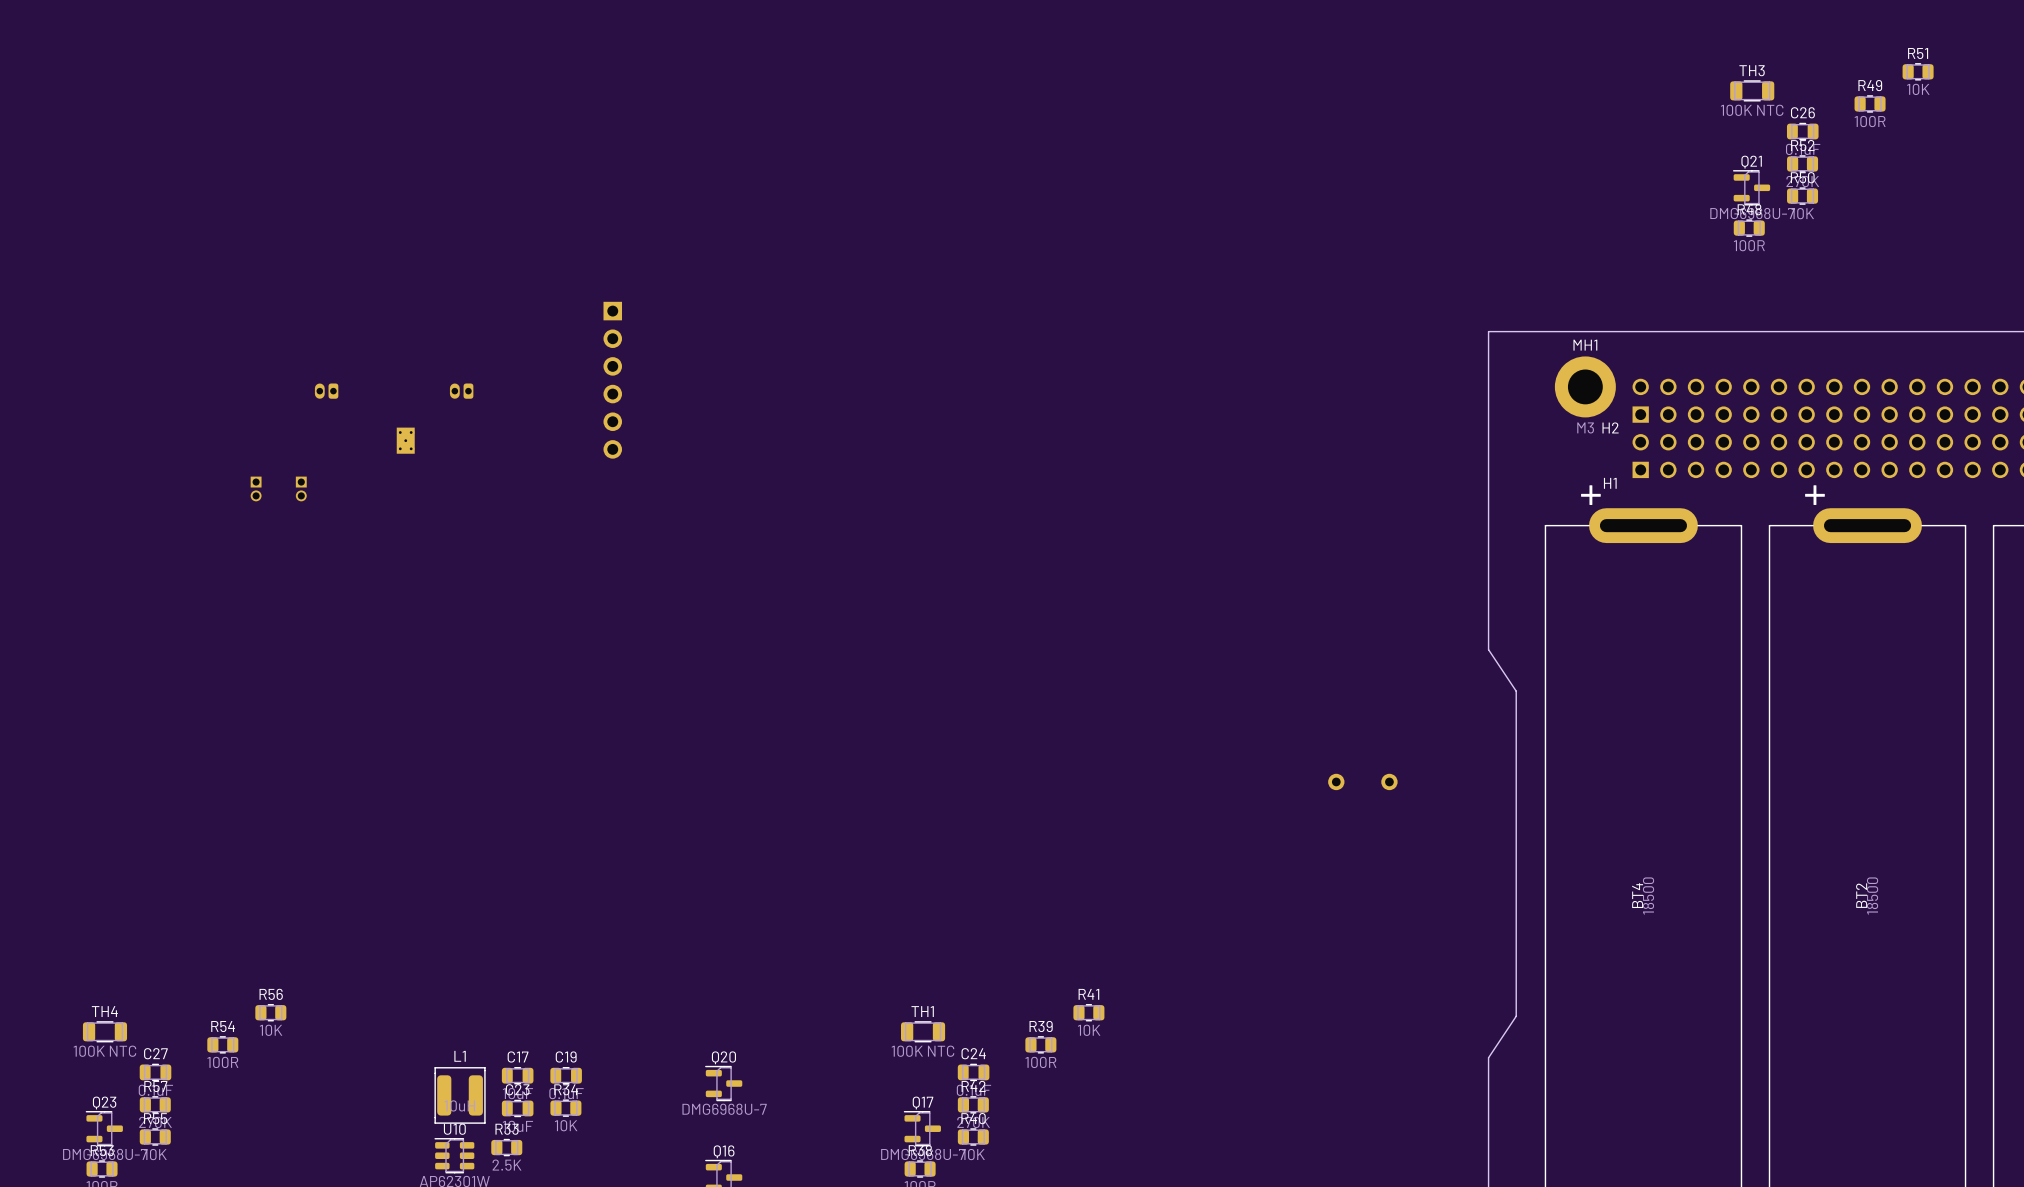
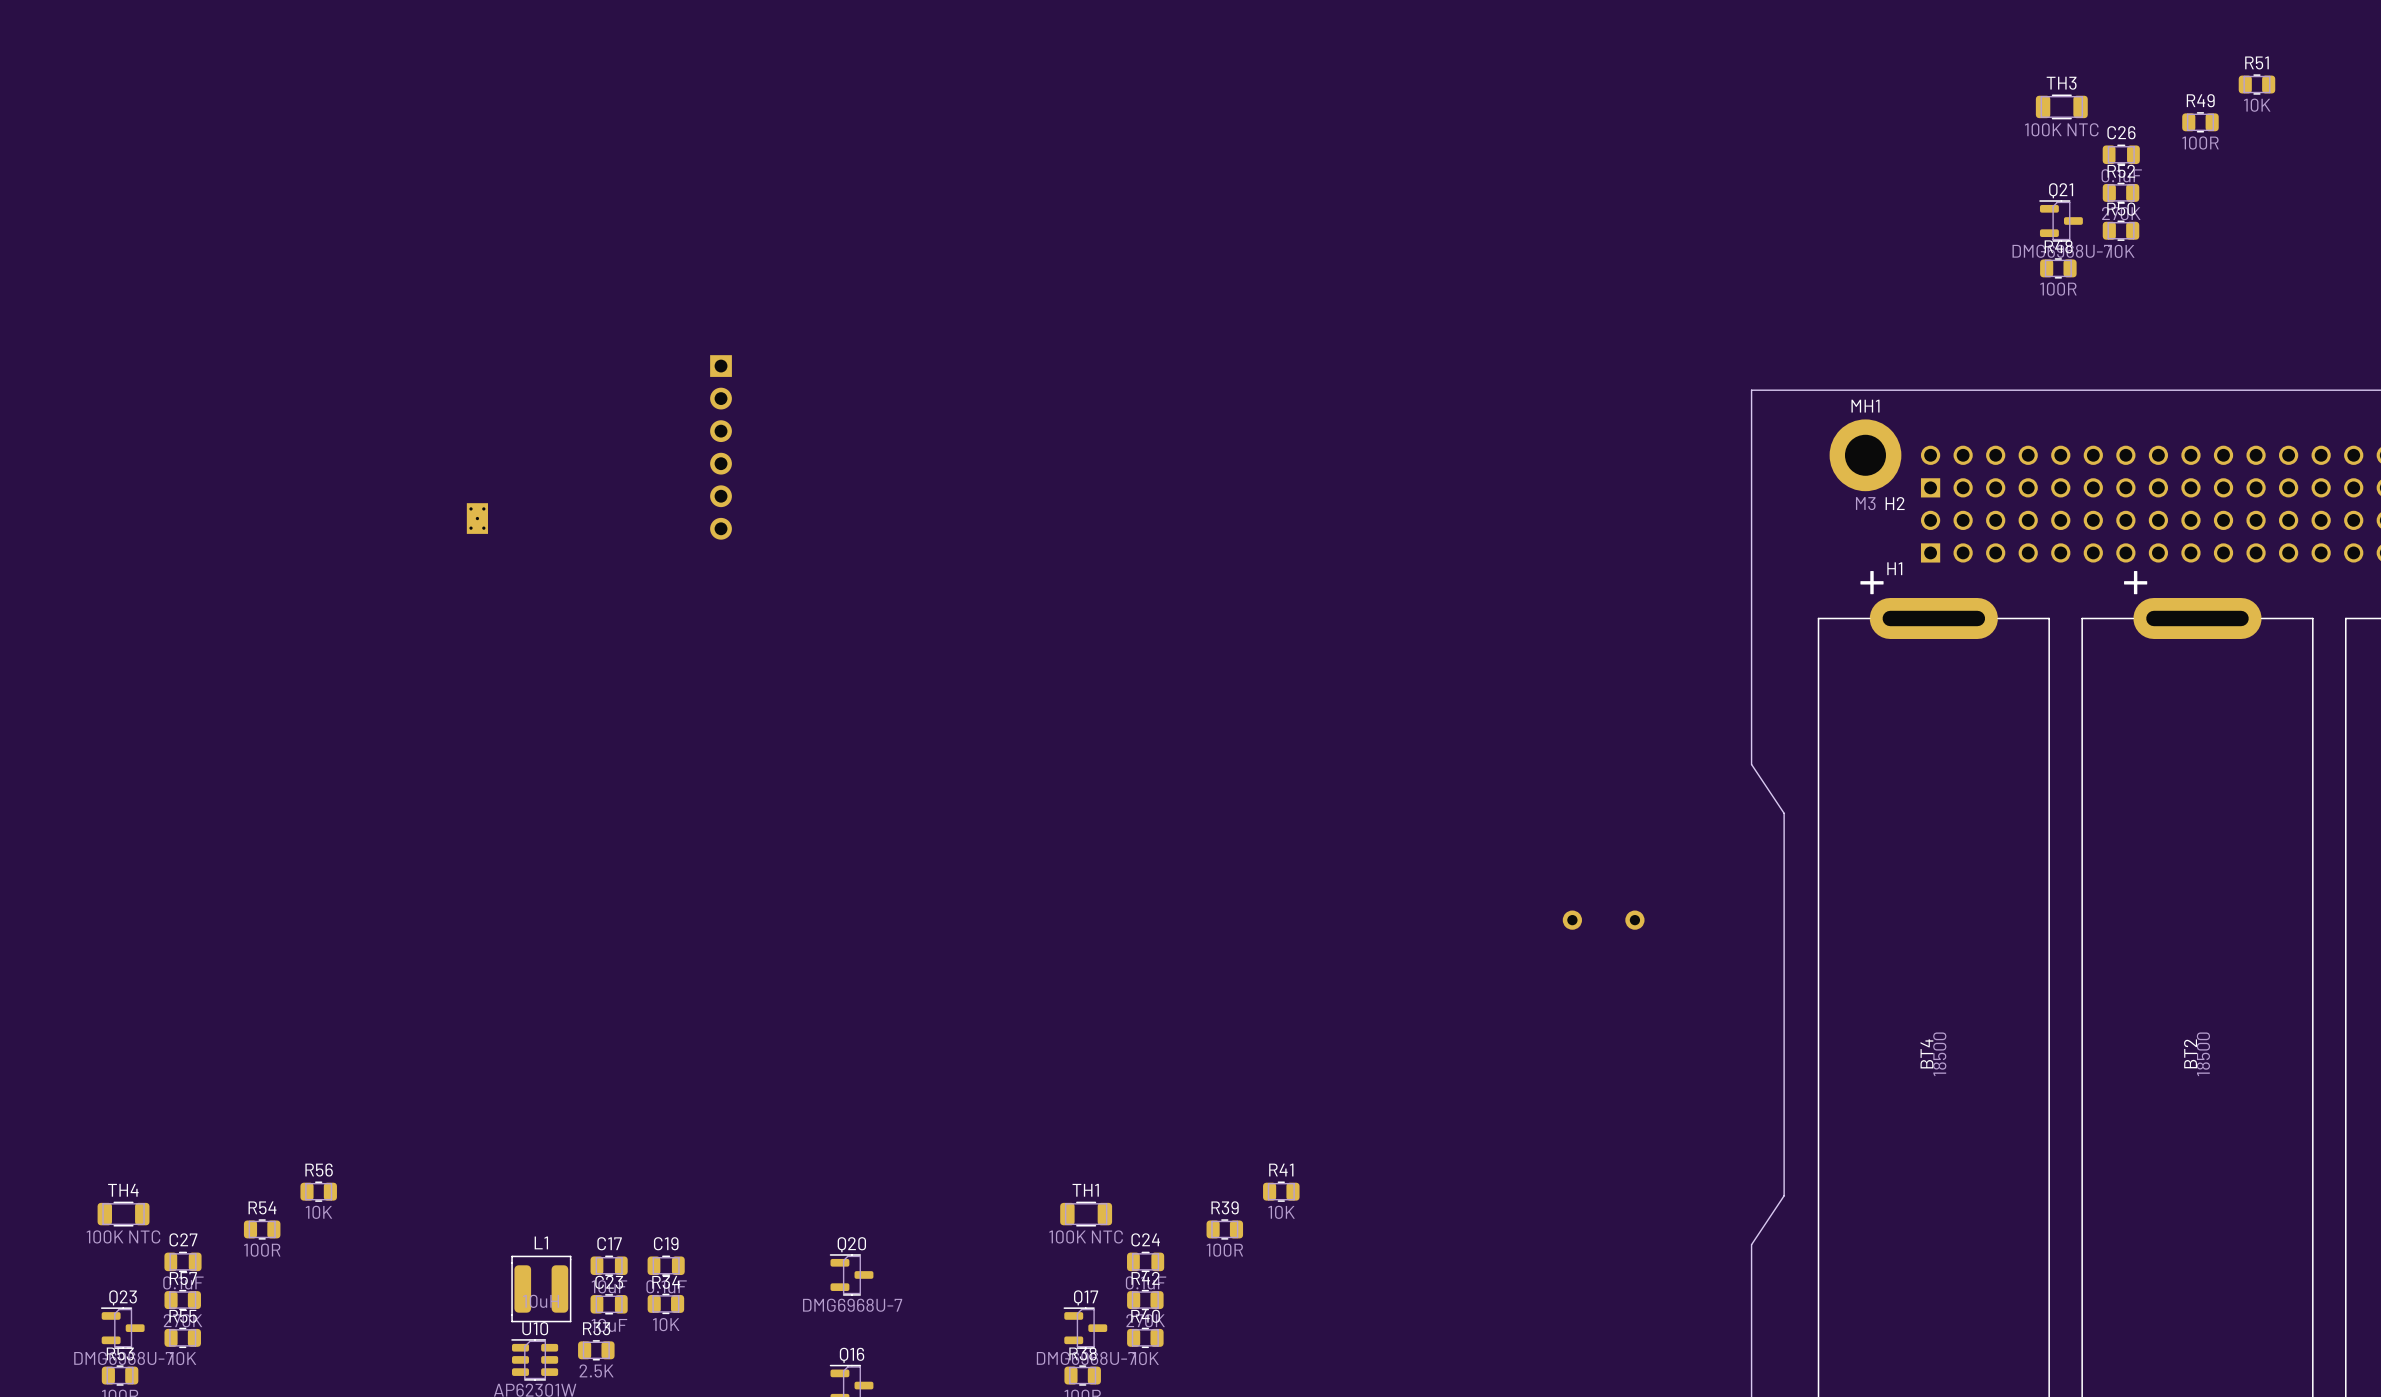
part: (326, 391) -> none
part: (461, 391) -> none
part: (256, 488) -> none
part: (301, 488) -> none

